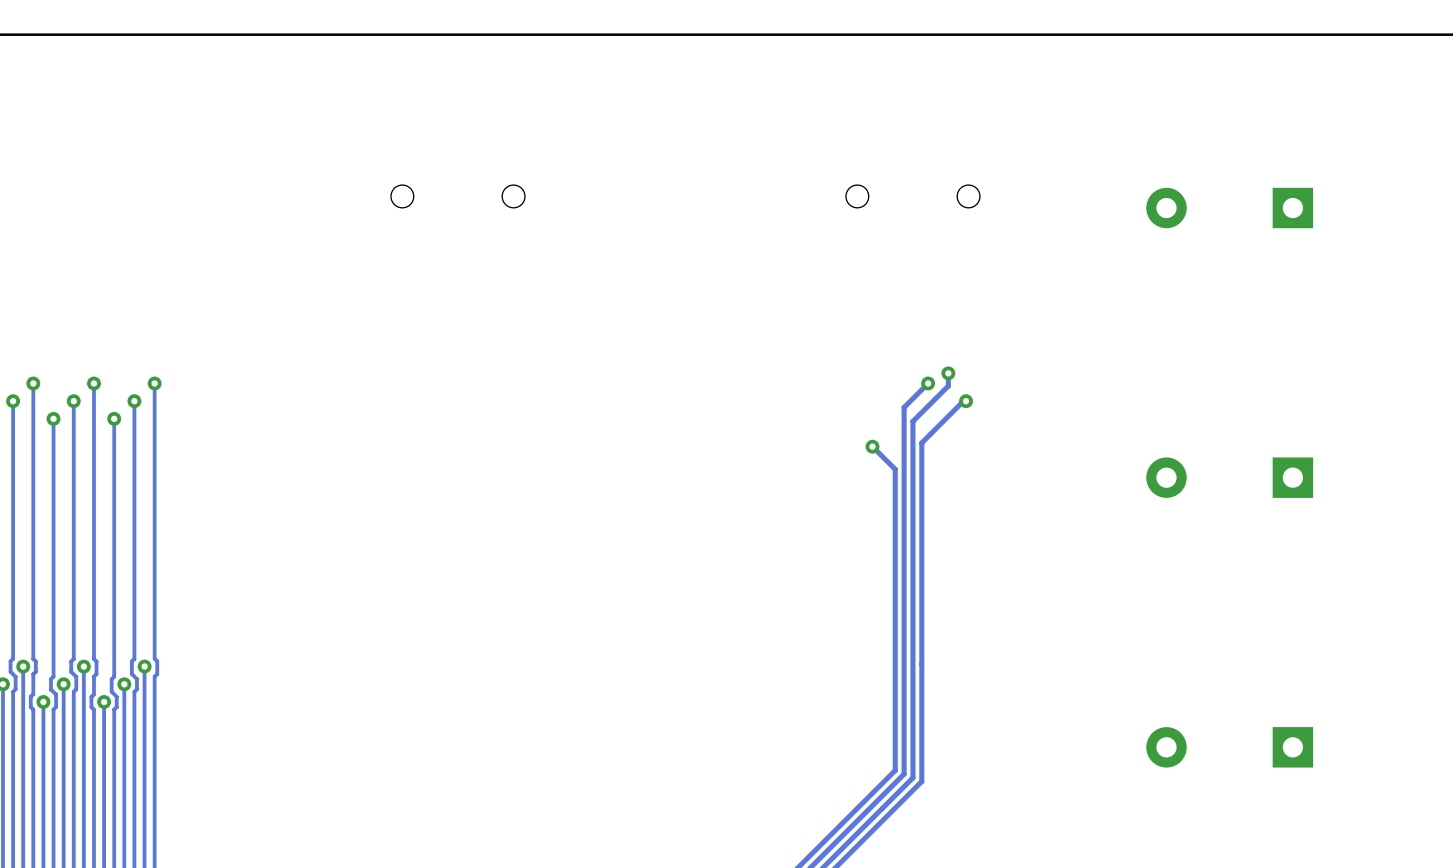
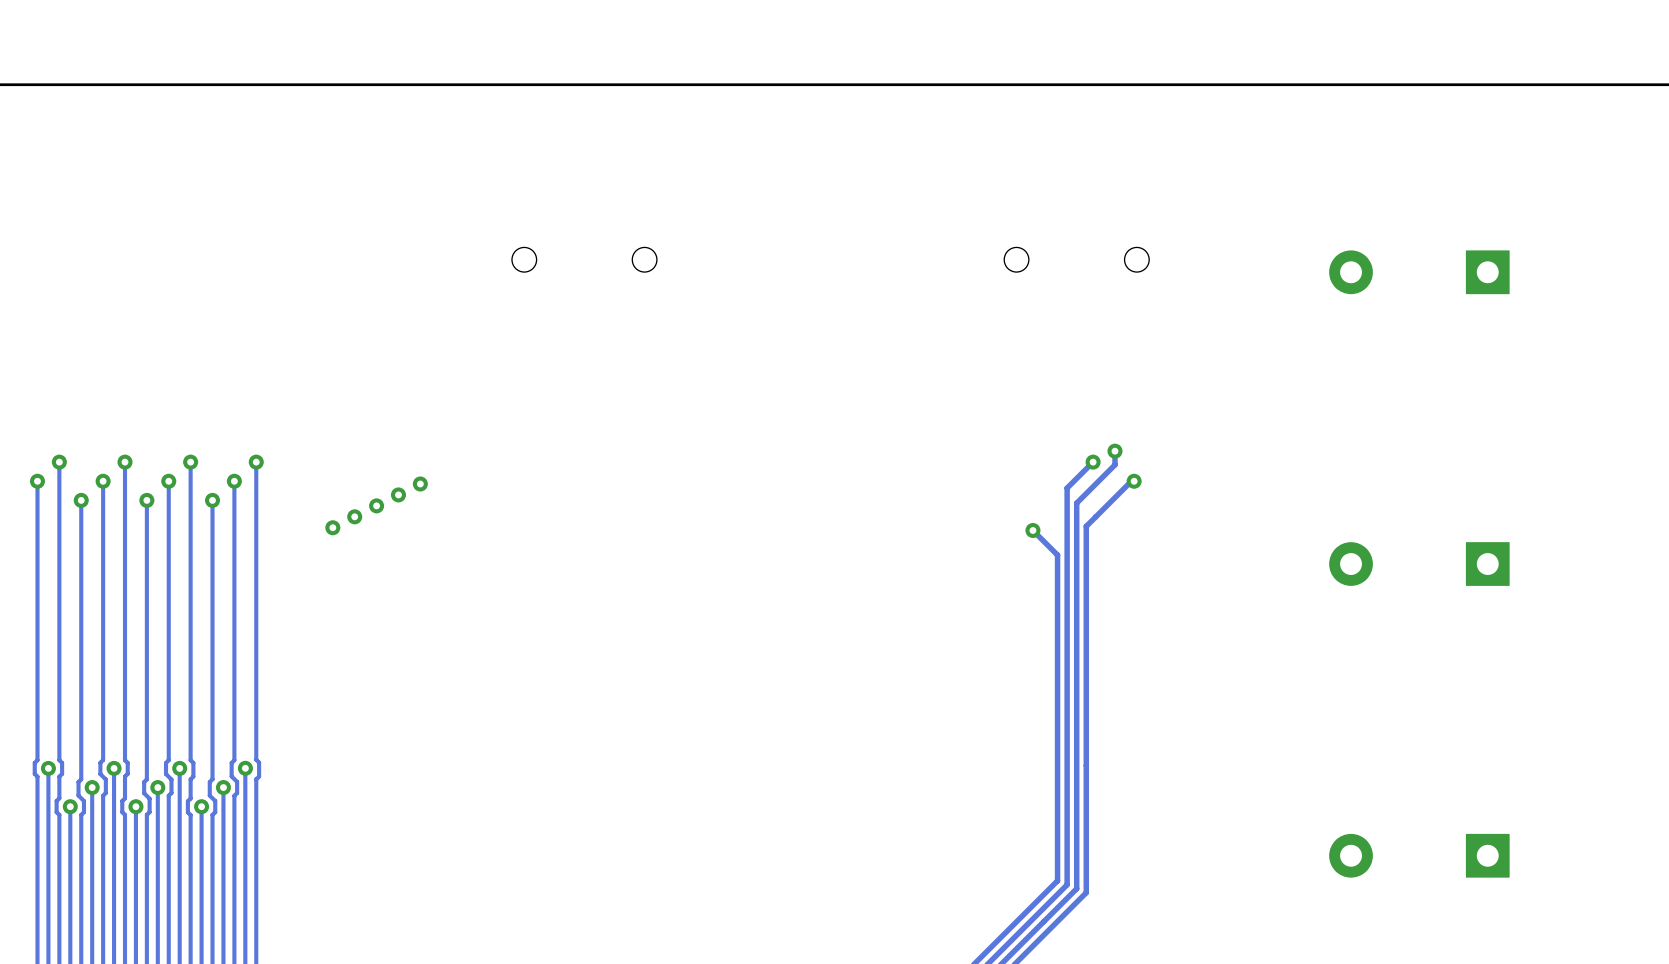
via: none -> (420, 484)
via: none -> (398, 494)
via: none -> (376, 505)
via: none -> (354, 516)
via: none -> (332, 527)

